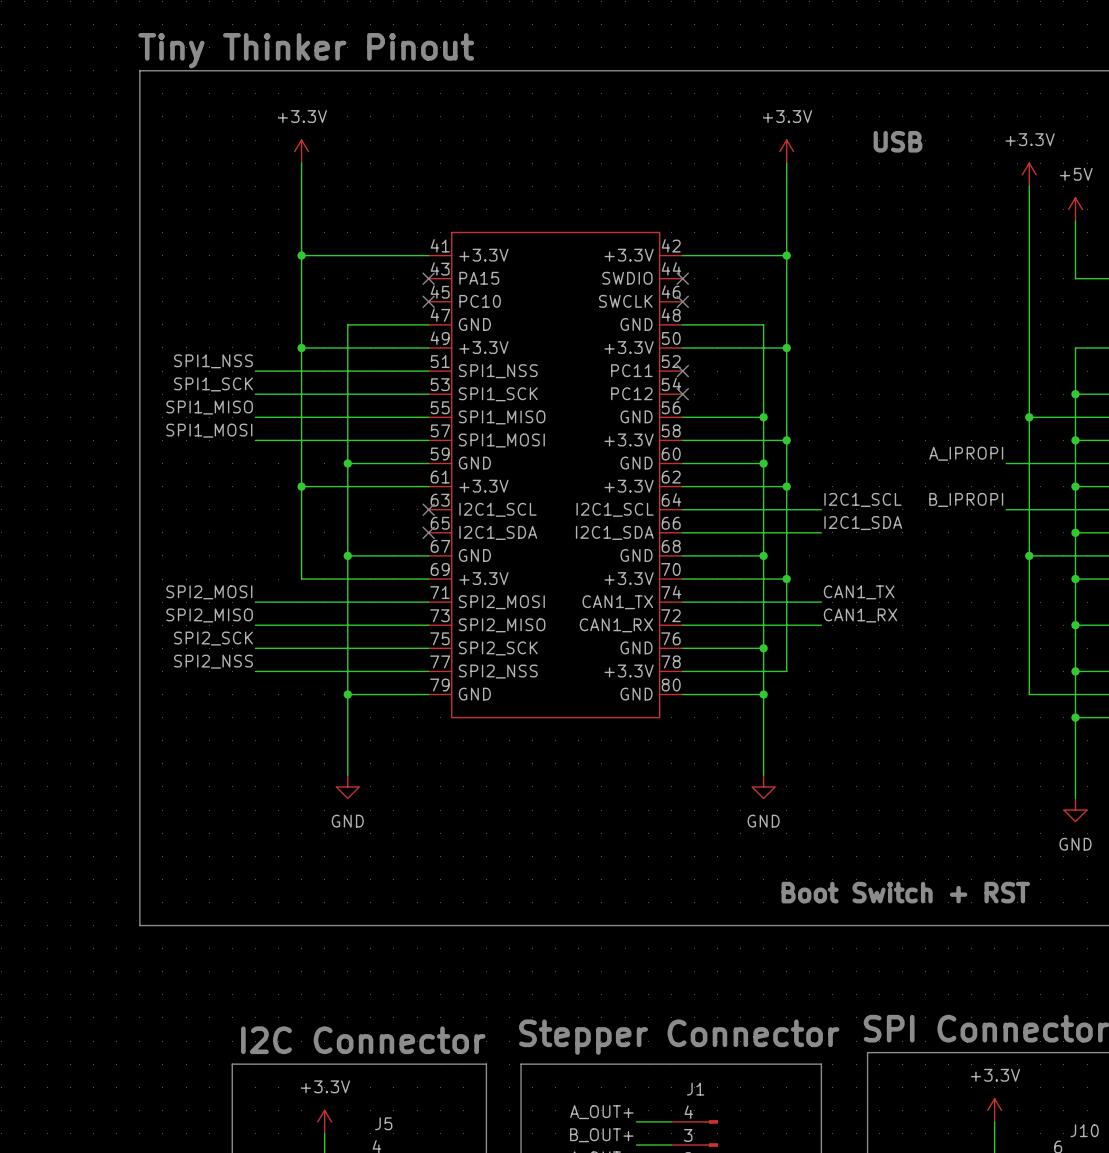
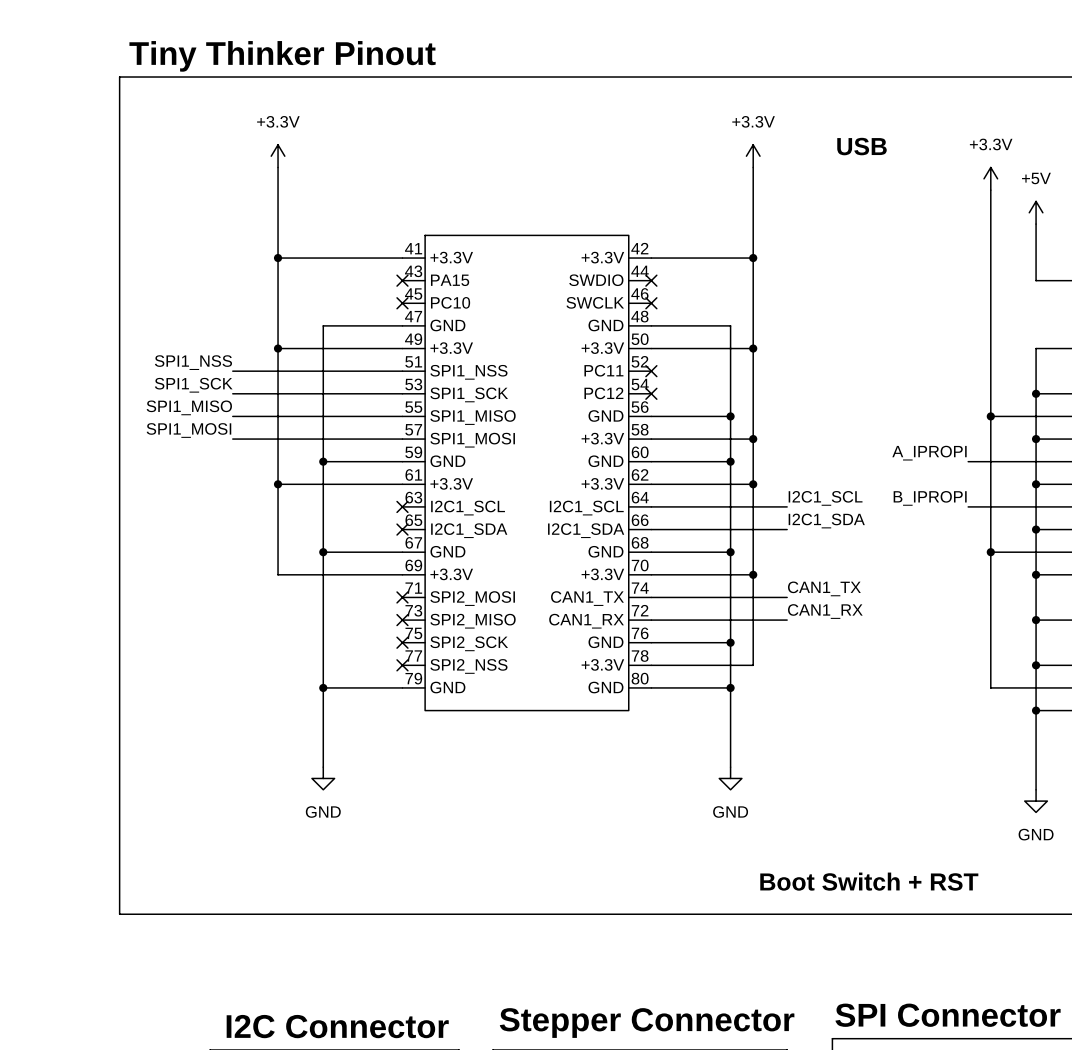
label: SPI2_MOSI (209, 592) -> none
wire: (255, 602) (428, 602) -> none
no-connect mark: none -> (402, 597)
label: SPI2_MISO (209, 615) -> none
wire: (255, 625) (428, 625) -> none
no-connect mark: none -> (402, 620)
label: SPI2_SCK (213, 638) -> none
wire: (255, 648) (428, 648) -> none
no-connect mark: none -> (402, 642)
label: SPI2_NSS (213, 661) -> none
wire: (255, 671) (428, 671) -> none
no-connect mark: none -> (402, 665)

